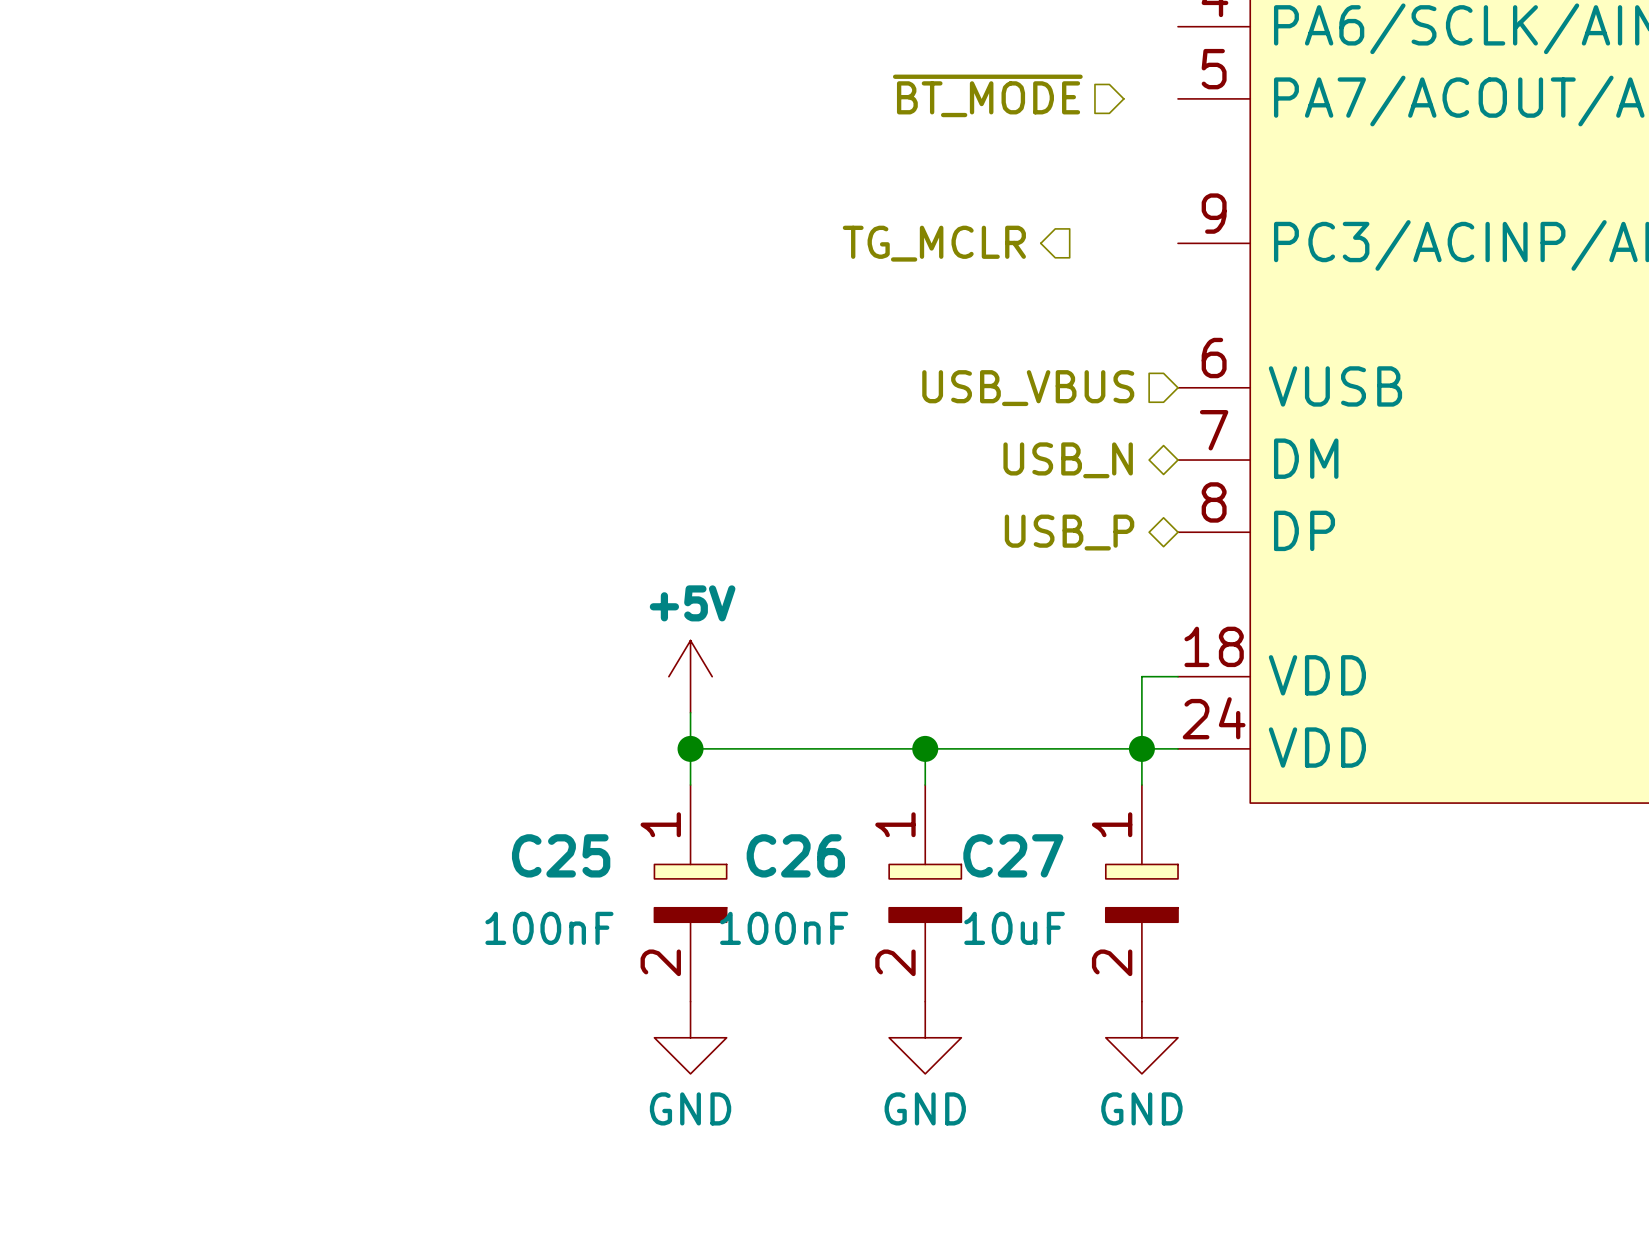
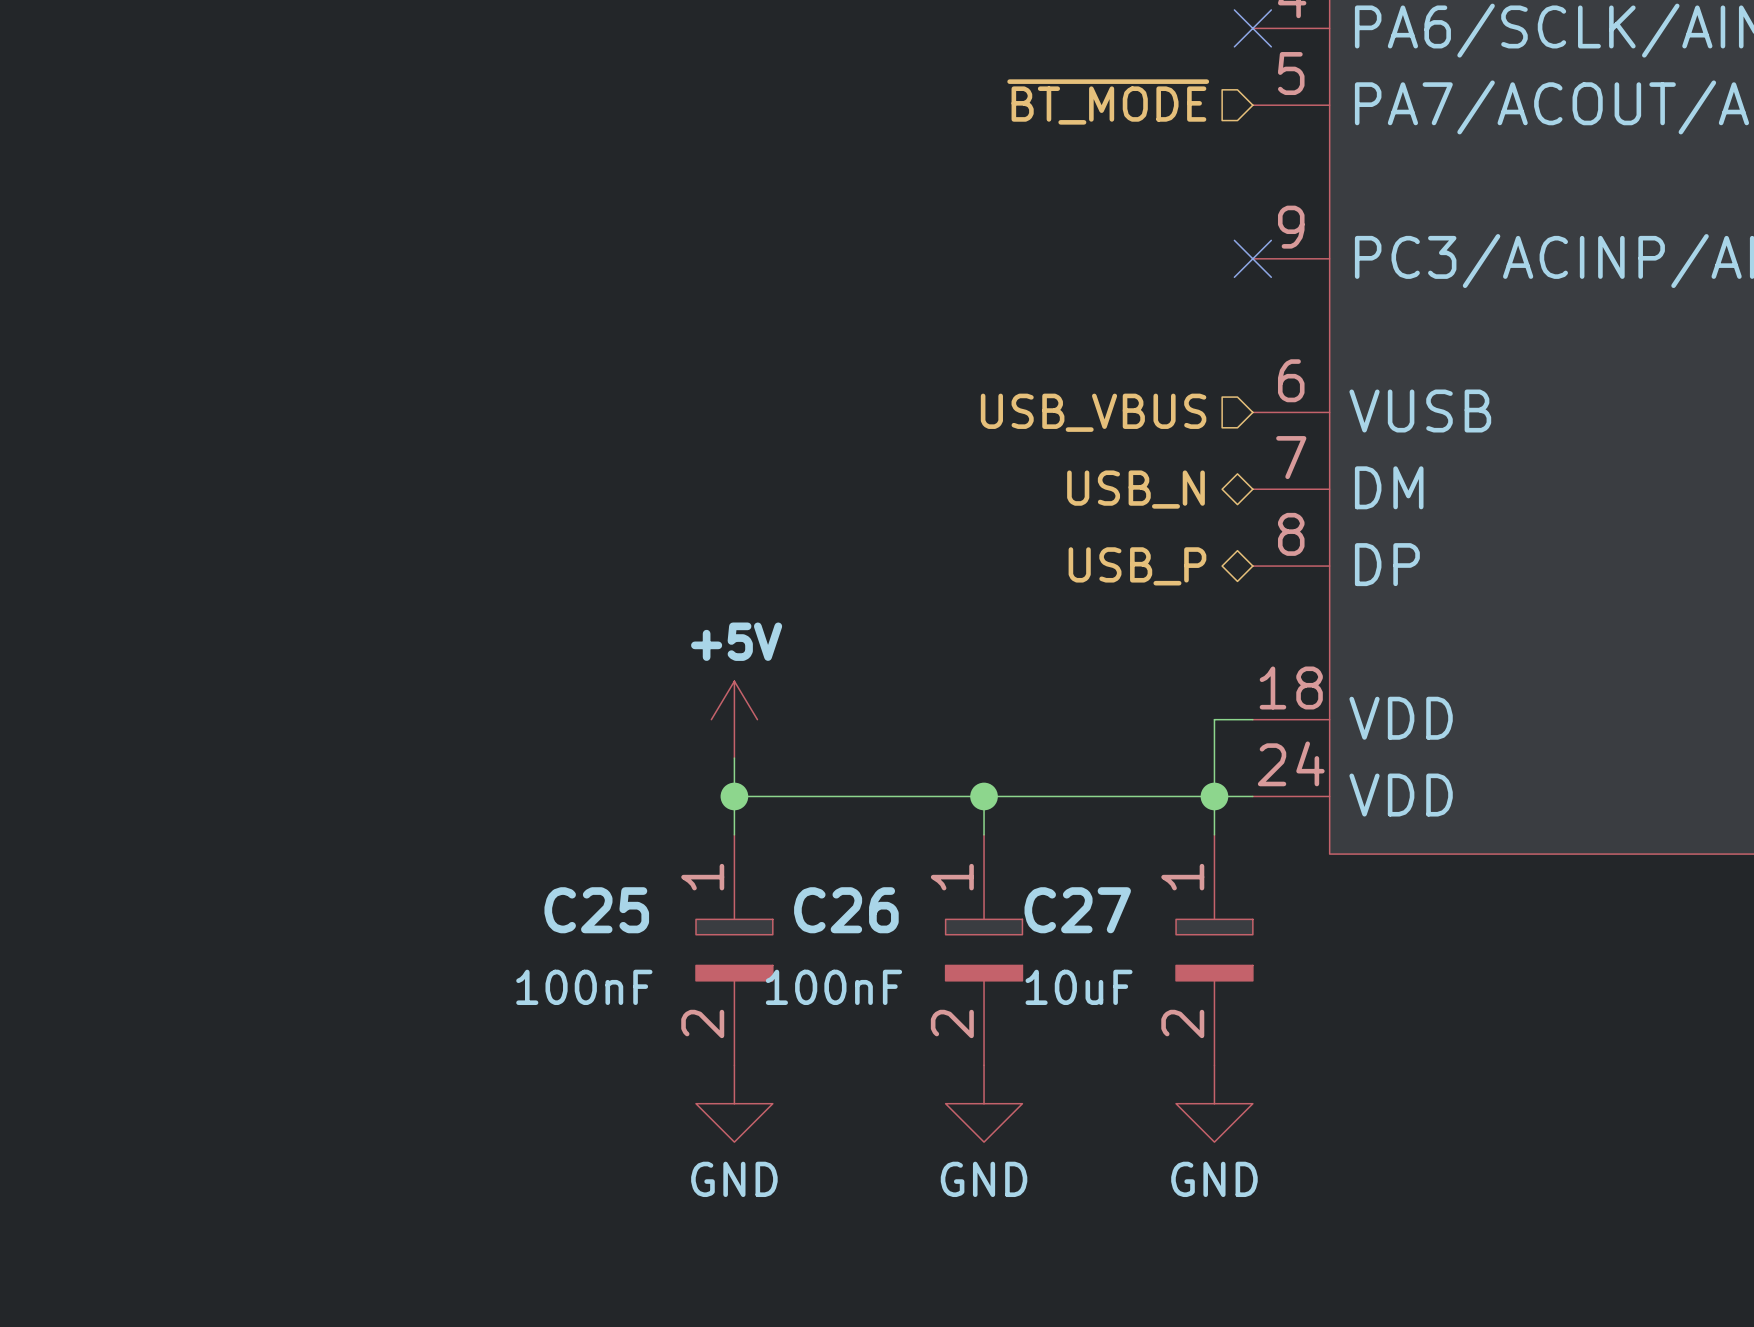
no-connect mark: none -> (1252, 28)
hierarchical label position: ~{BT_MODE} (987, 95) -> ~{BT_MODE} (1108, 101)
hierarchical label: TG_MCLR (934, 243) -> none
no-connect mark: none -> (1252, 258)

